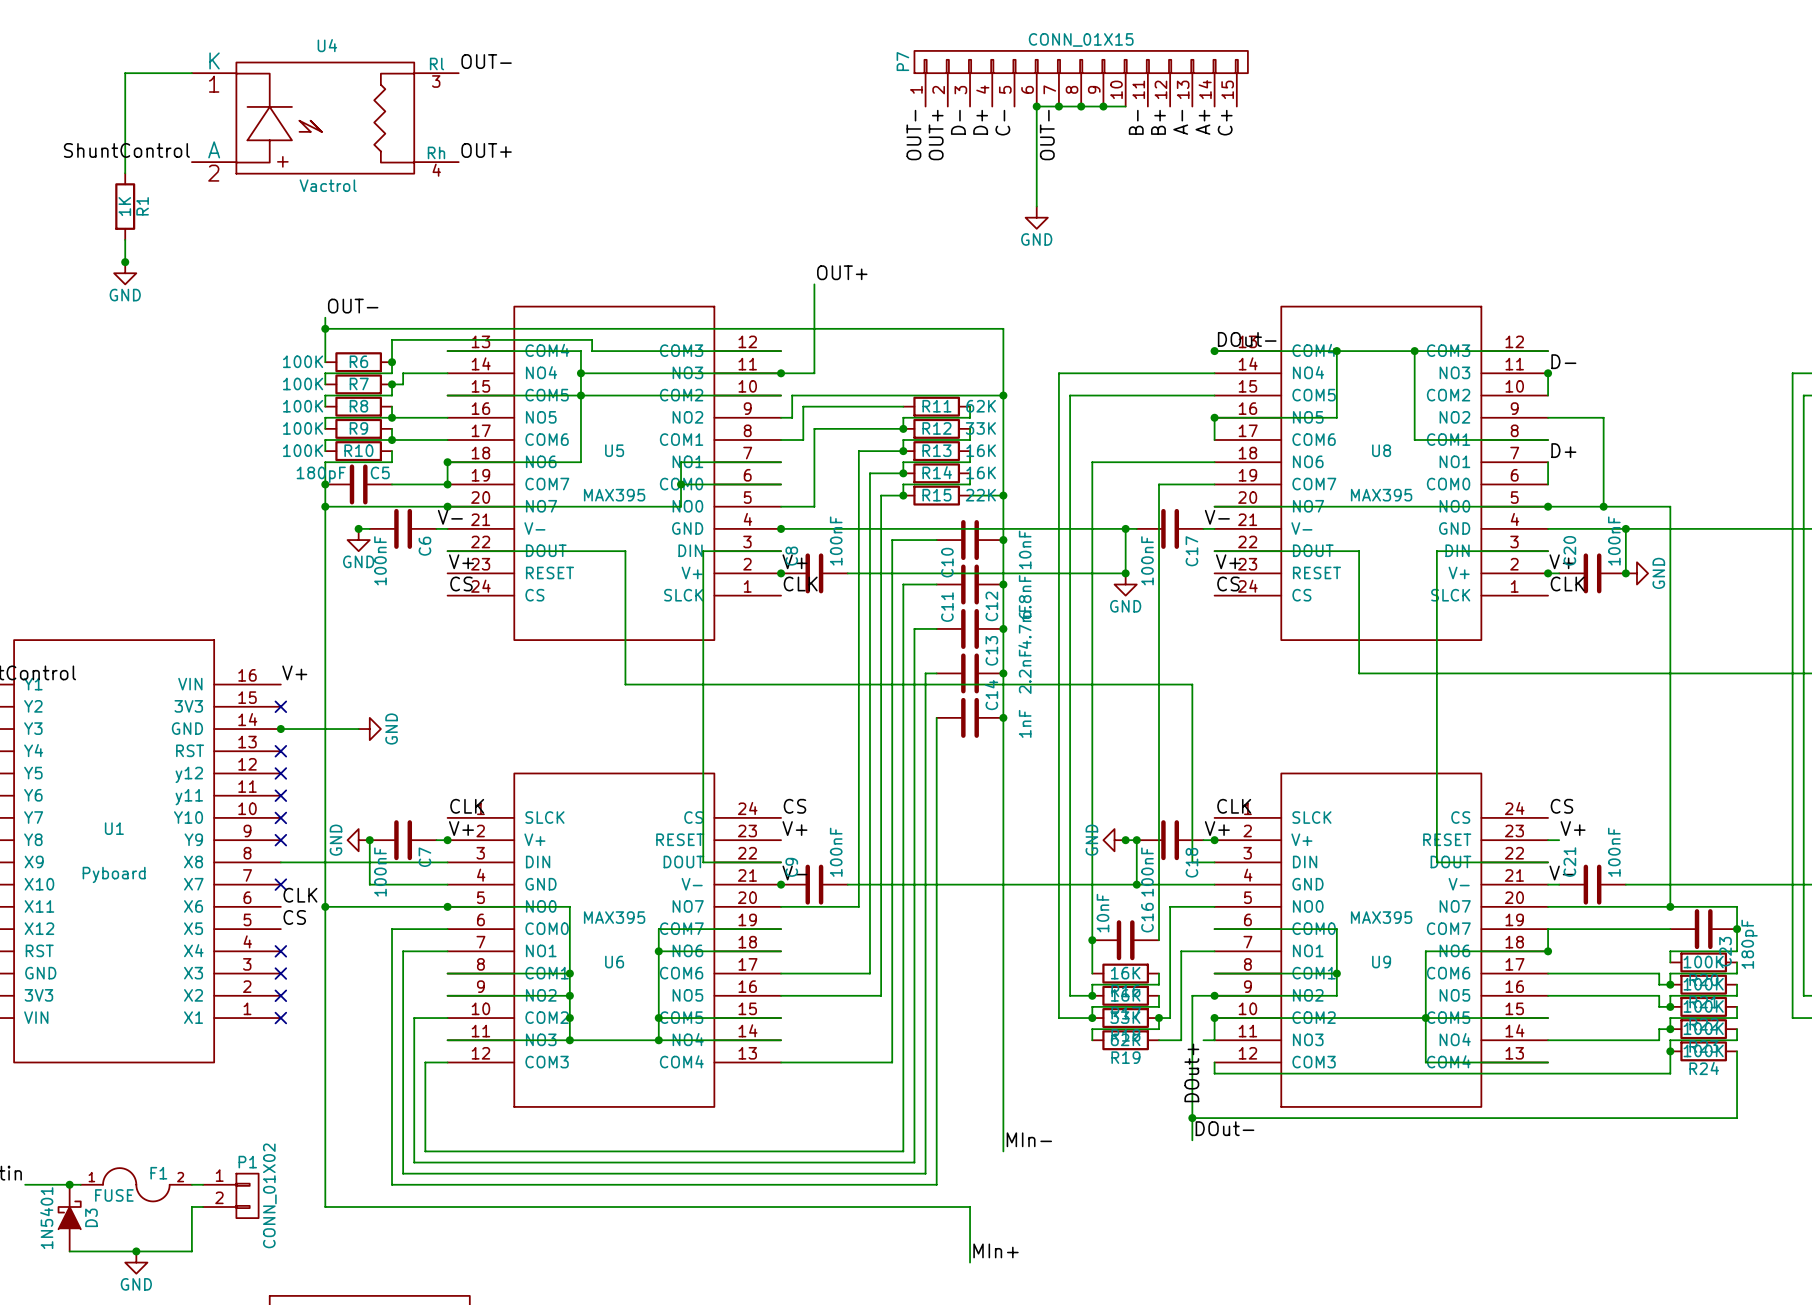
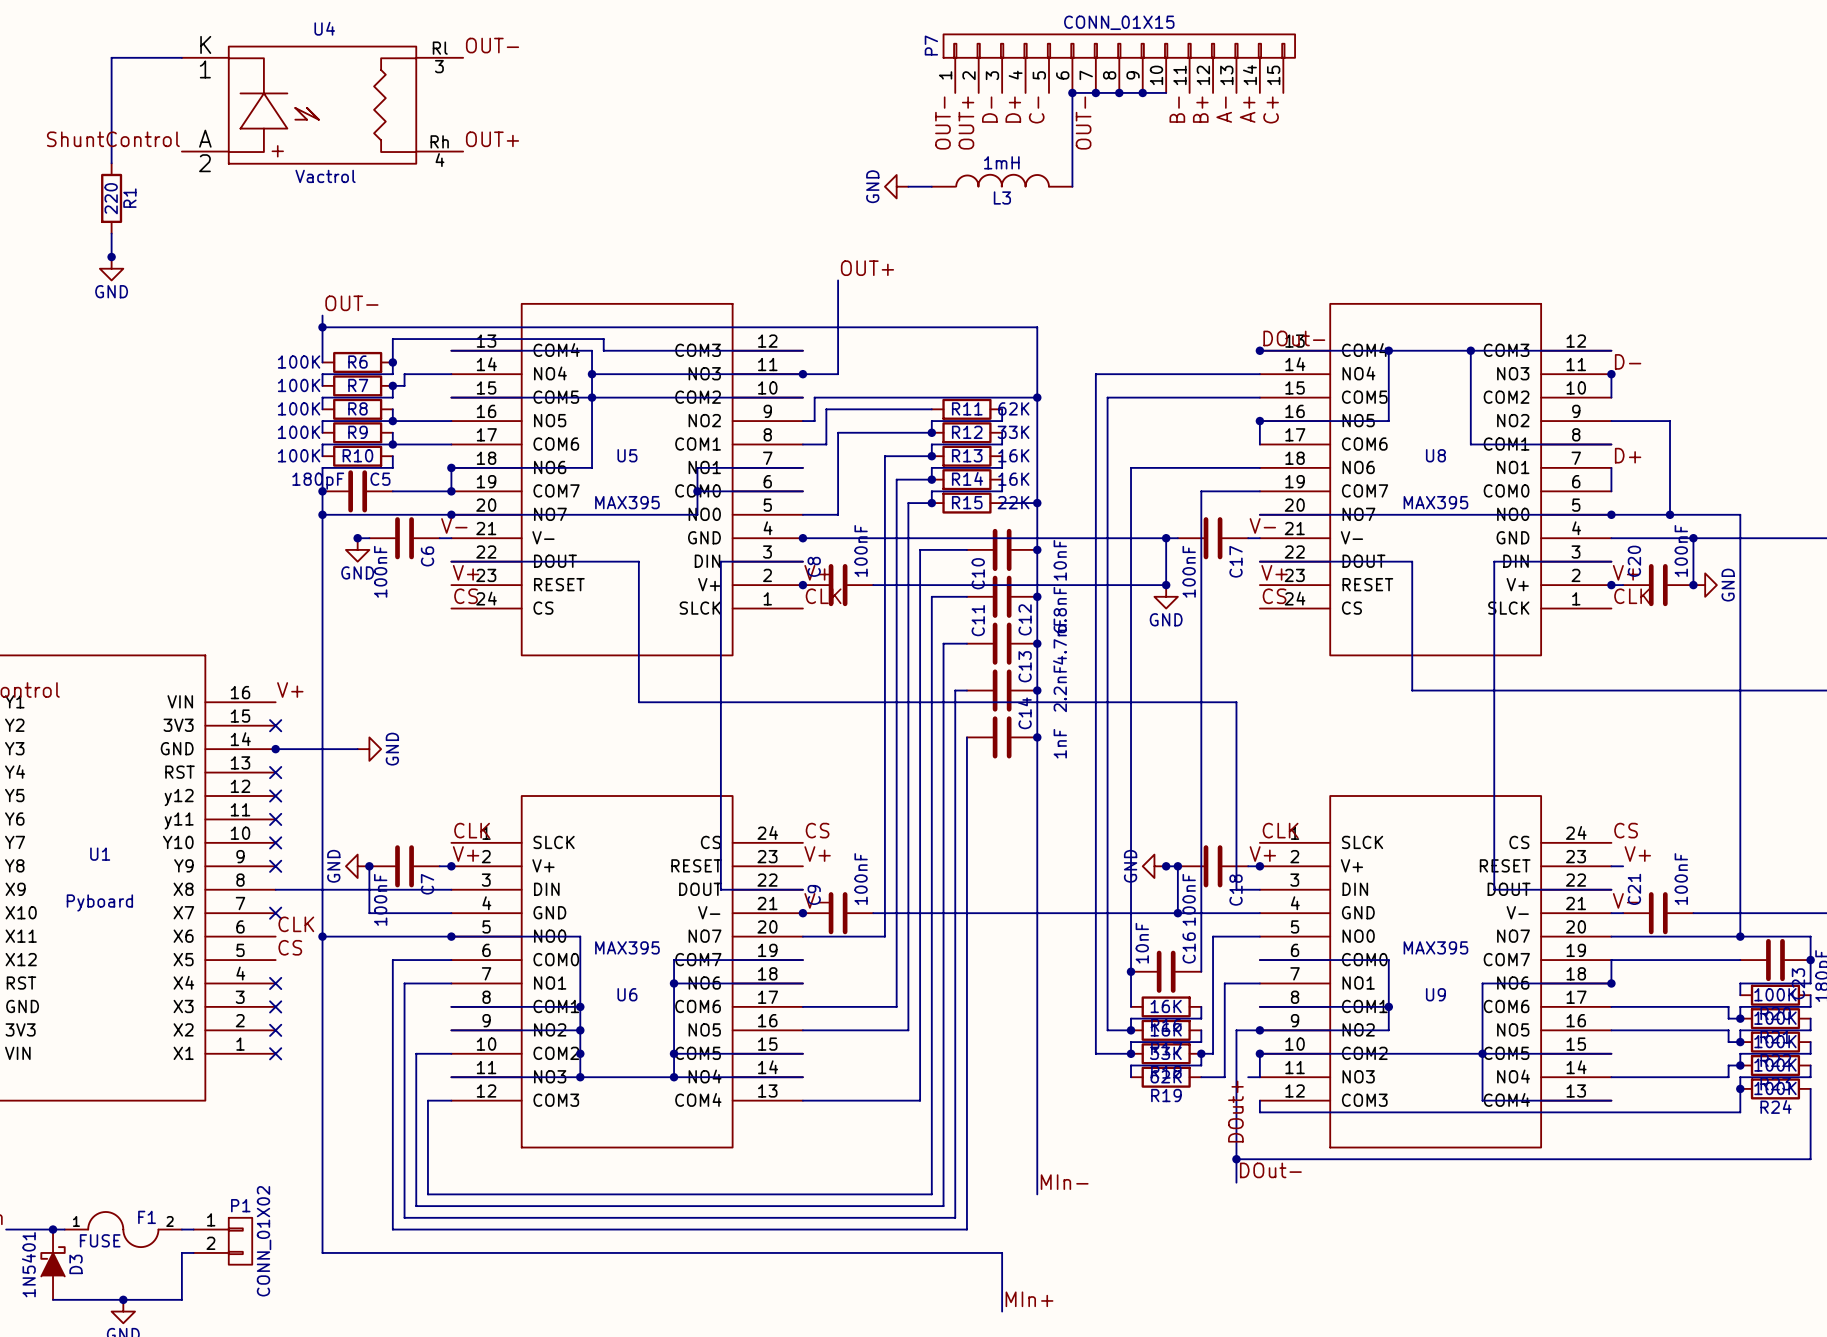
L3: none -> 1mH (1002, 180)
wire: none -> (908, 186) (931, 186)
wire: (1036, 195) (1036, 206) -> none
R1 value: 1K (124, 206) -> 220 (111, 198)
power symbol rotation: 0° (1036, 217) -> 90° clockwise (896, 186)
power symbol position: GND (1036, 217) -> GND (896, 186)

